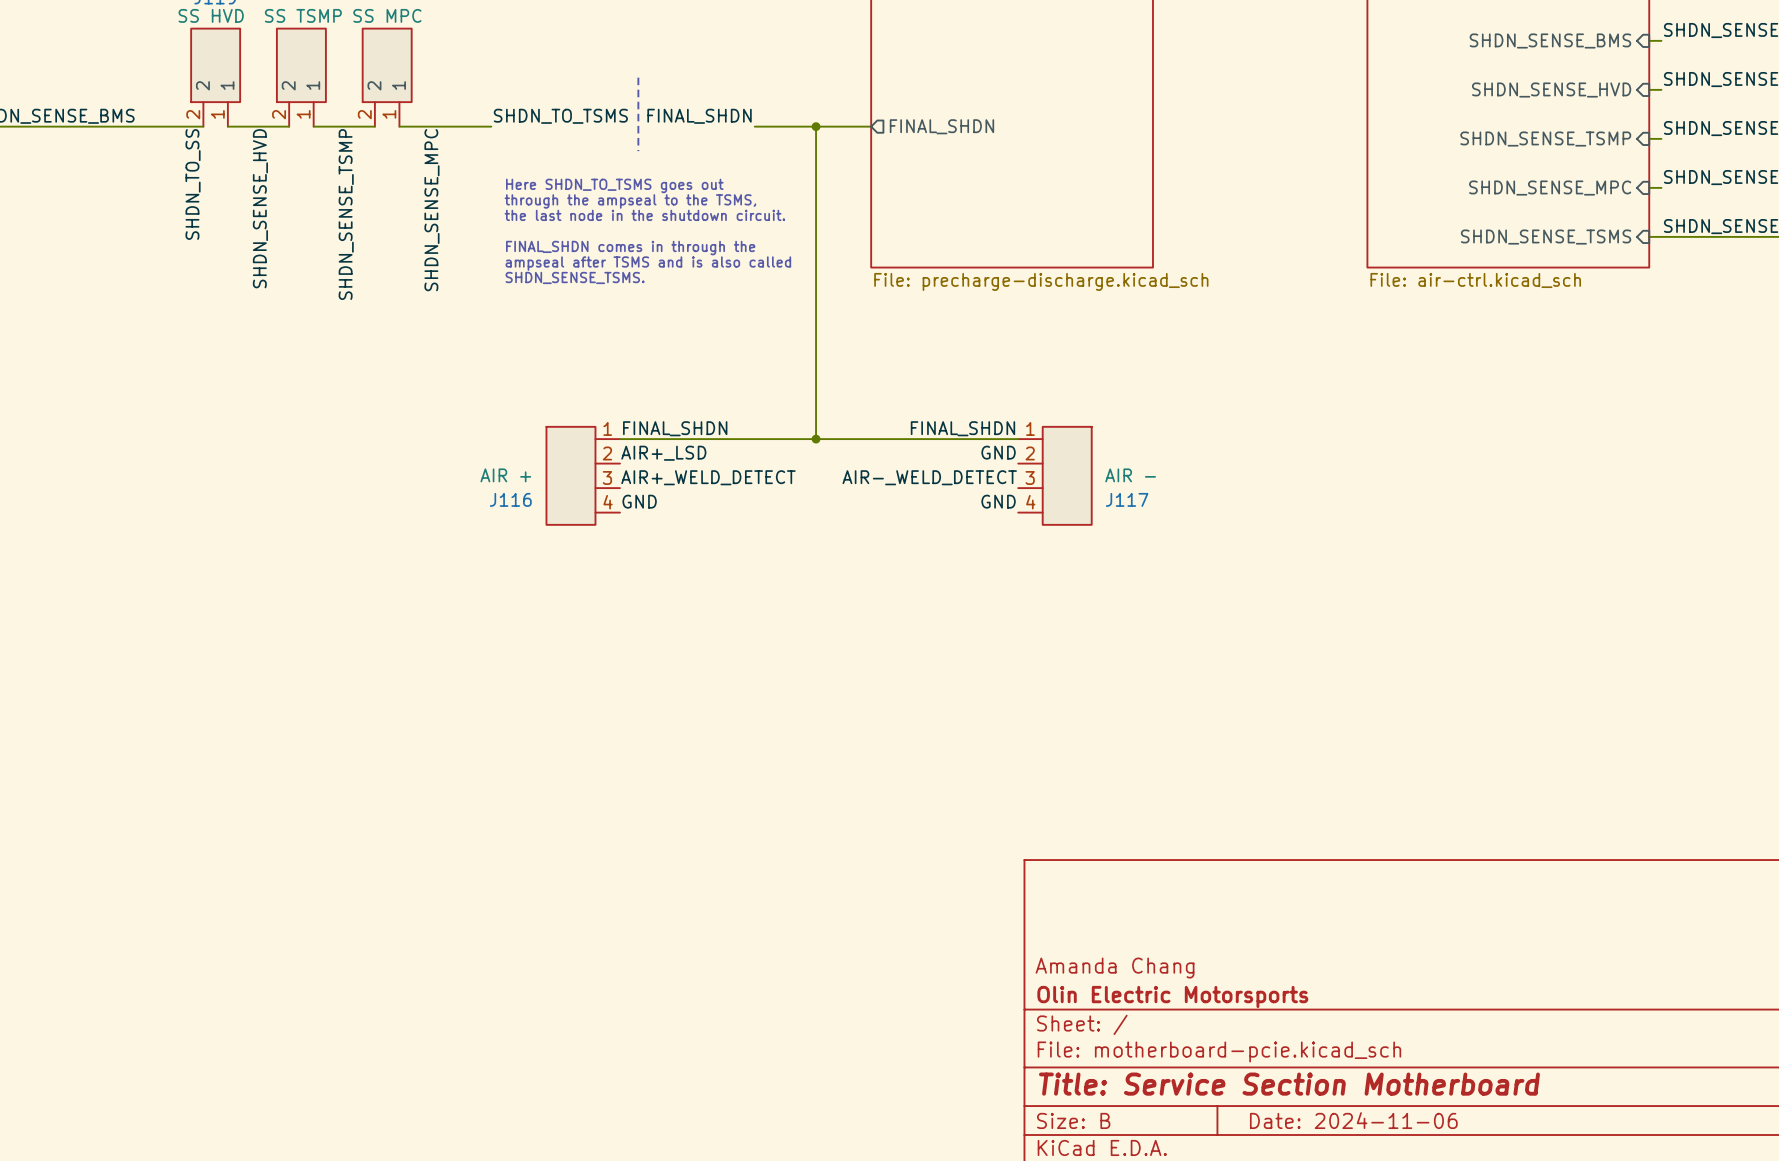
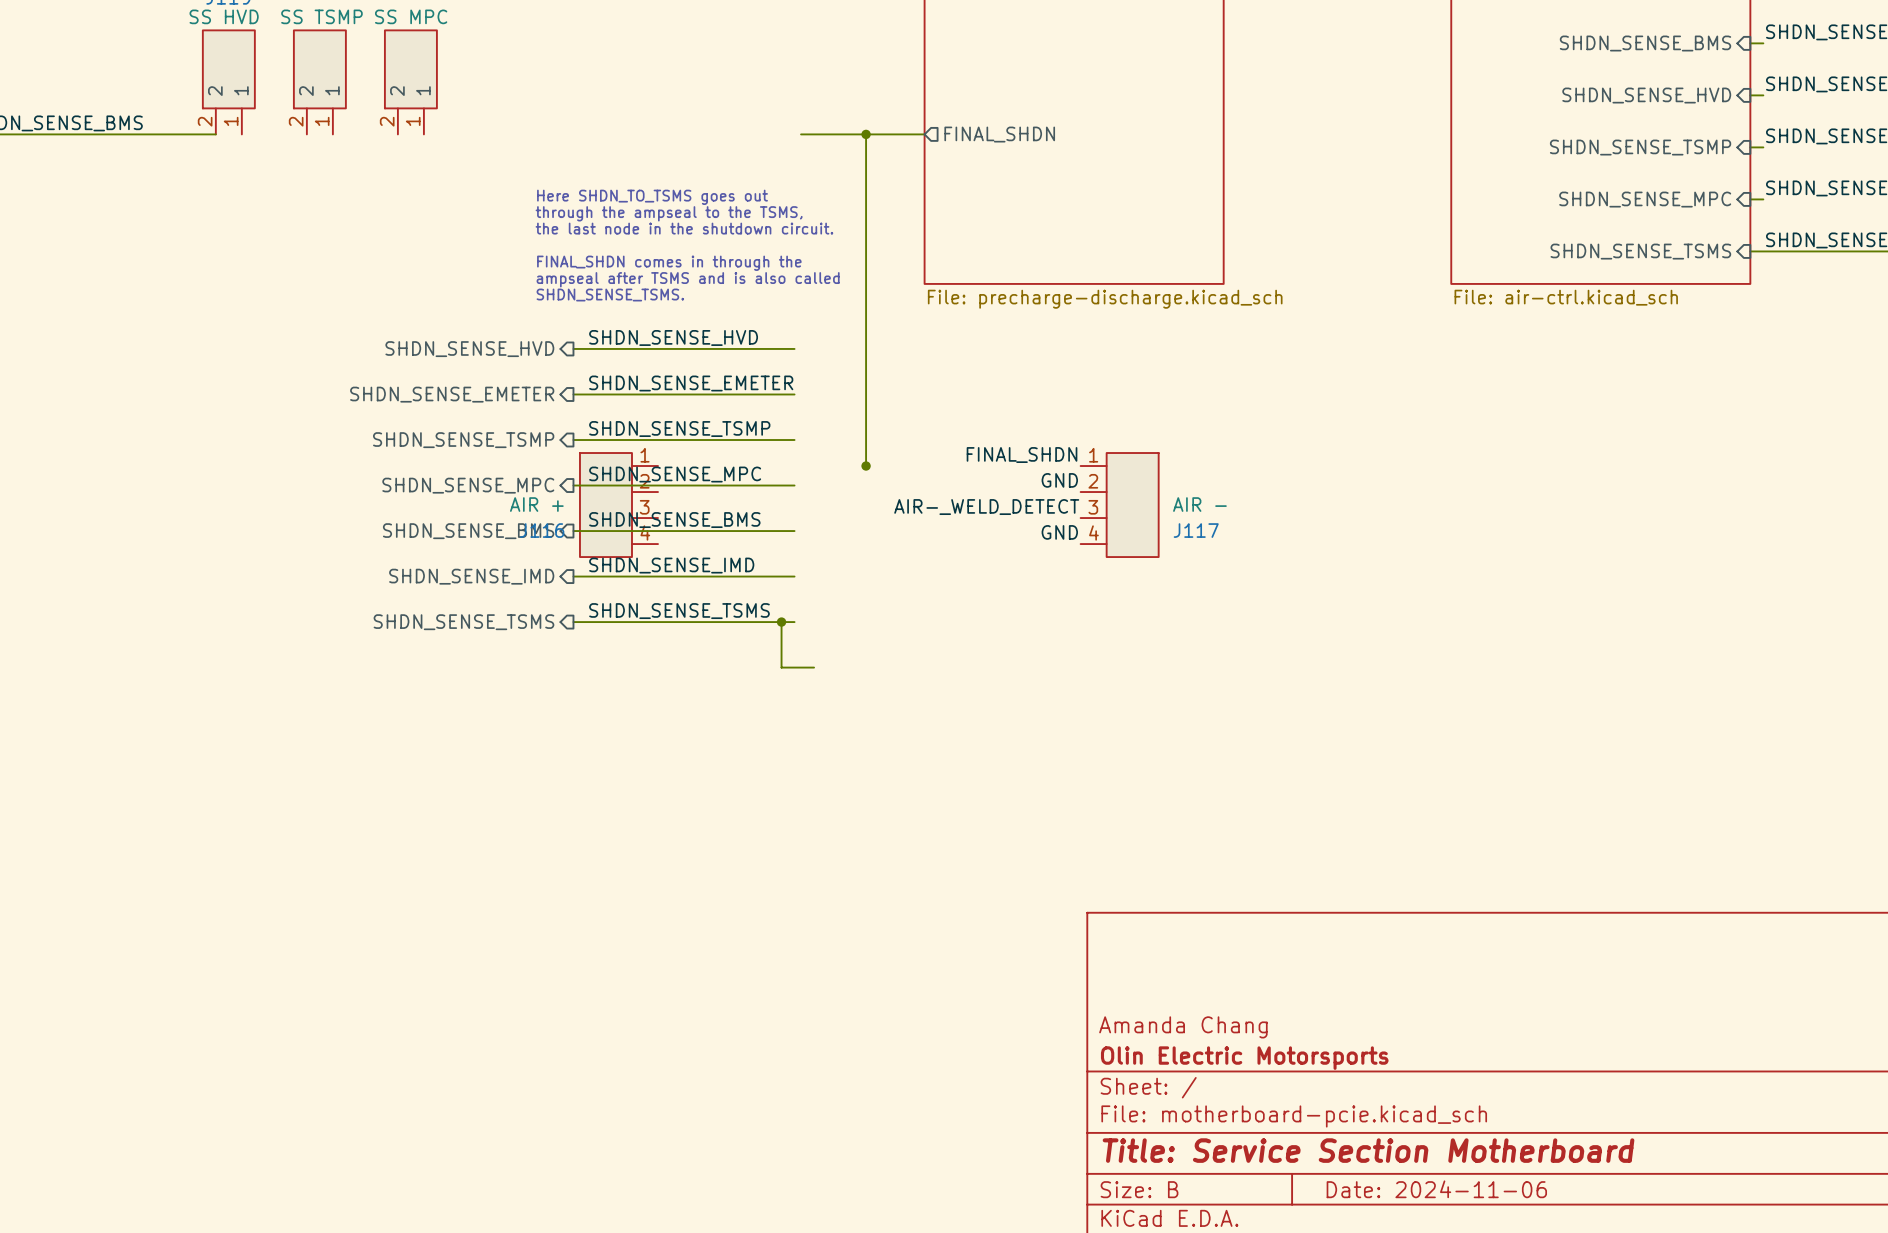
line: (638, 77) (638, 151) -> none
label: SHDN_TO_TSMS (560, 116) -> none
label: FINAL_SHDN (699, 116) -> none
wire: (227, 126) (289, 126) -> none
wire: (313, 126) (374, 126) -> none
wire: (399, 126) (491, 126) -> none
label: SHDN_TO_SS (193, 184) -> none
label: SHDN_SENSE_HVD (260, 208) -> none
label: SHDN_SENSE_MPC (431, 210) -> none
label: SHDN_SENSE_TSMP (346, 214) -> none
label: none -> SHDN_SENSE_HVD (673, 337)
sheet pin: none -> SHDN_SENSE_HVD (469, 349)
wire: none -> (573, 348) (794, 348)
label: none -> SHDN_SENSE_EMETER (691, 383)
sheet pin: none -> SHDN_SENSE_EMETER (452, 394)
wire: none -> (573, 394) (794, 394)
label: none -> SHDN_SENSE_TSMP (679, 429)
sheet pin: none -> SHDN_SENSE_TSMP (463, 440)
wire: none -> (573, 440) (794, 440)
label: FINAL_SHDN (675, 428) -> none
wire: (619, 439) (1018, 439) -> none
label: none -> SHDN_SENSE_MPC (675, 474)
label: AIR+_LSD (663, 453) -> none
sheet pin: none -> SHDN_SENSE_MPC (468, 485)
wire: none -> (573, 485) (794, 485)
label: AIR+_WELD_DETECT (708, 477) -> none
label: none -> SHDN_SENSE_BMS (674, 520)
sheet pin: none -> SHDN_SENSE_BMS (468, 531)
wire: none -> (573, 531) (794, 531)
label: GND (639, 501) -> none
label: none -> SHDN_SENSE_IMD (671, 565)
sheet pin: none -> SHDN_SENSE_IMD (471, 576)
wire: none -> (573, 576) (794, 576)
label: none -> SHDN_SENSE_TSMS (679, 611)
sheet pin: none -> SHDN_SENSE_TSMS (463, 622)
wire: none -> (573, 622) (794, 622)
wire: none -> (781, 622) (781, 667) (814, 667)
junction: none -> (781, 622)

